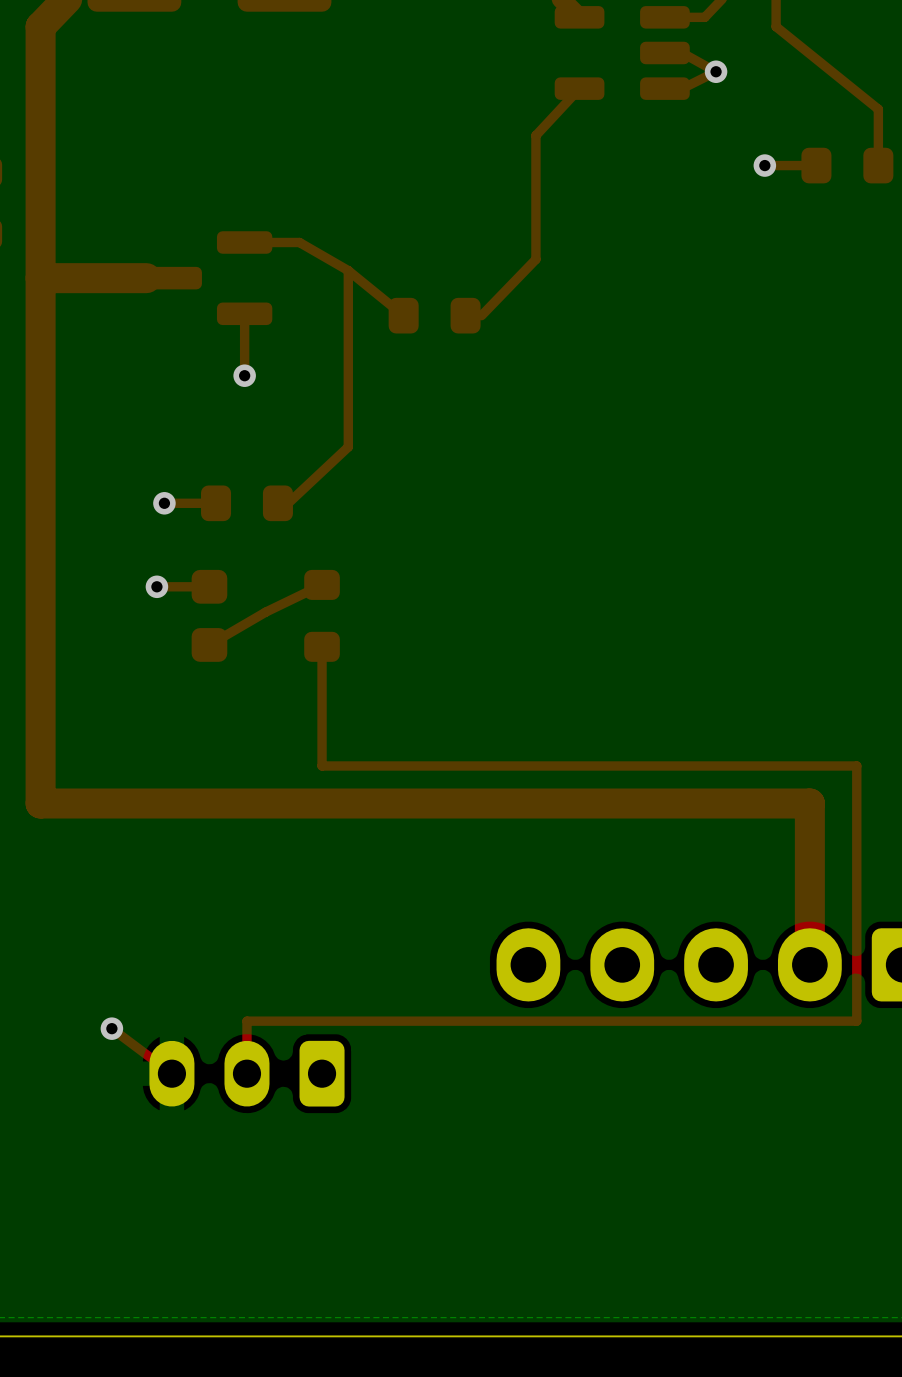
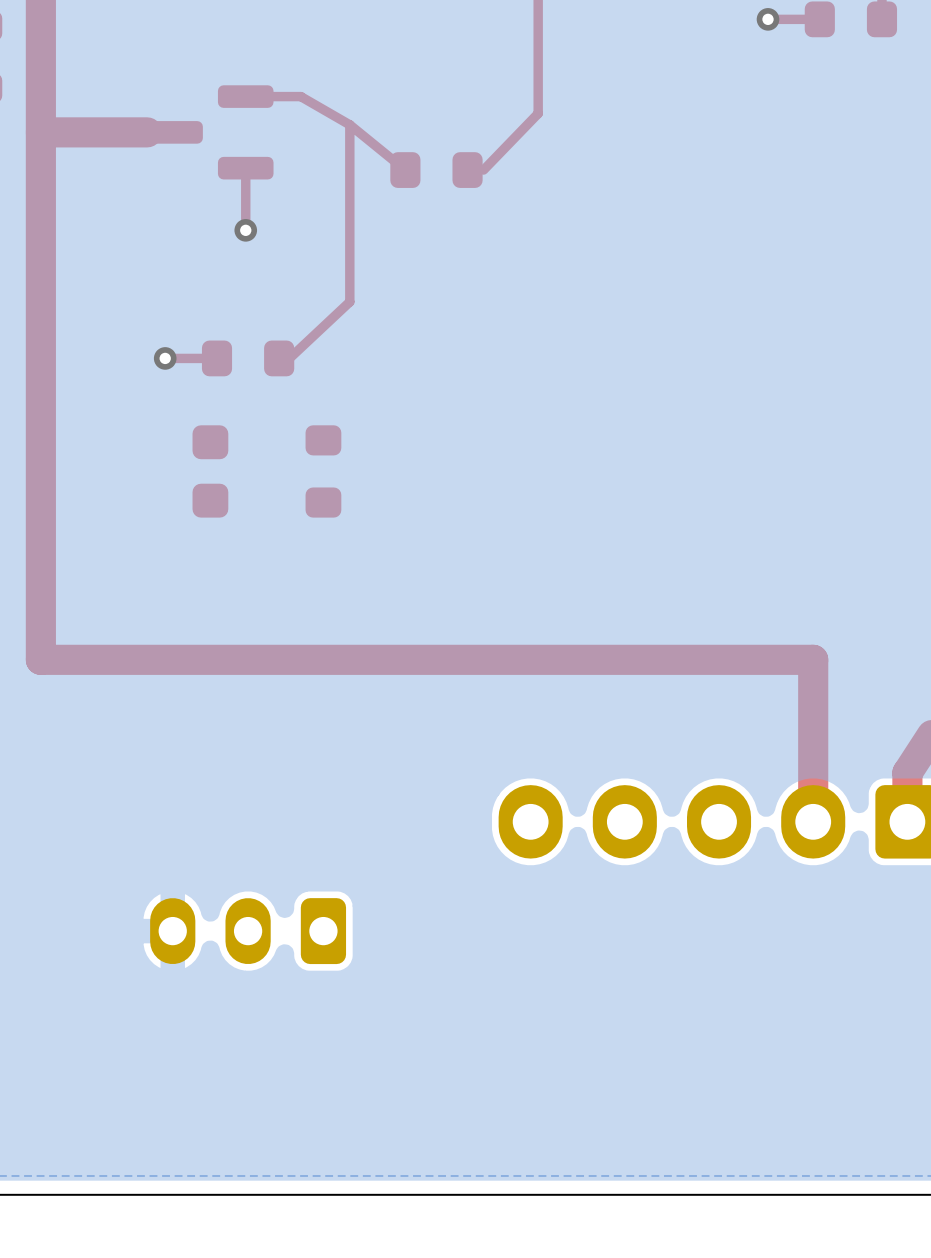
top track: (322, 584) (265, 612) (209, 644) -> none
via: (156, 586) -> none
top track: (209, 586) (156, 586) -> none
top track: (322, 653) (322, 765) (856, 765) (856, 1021) (246, 1021) (246, 1073) -> none
top track: (111, 1028) (171, 1073) -> none
via: (111, 1028) -> none

